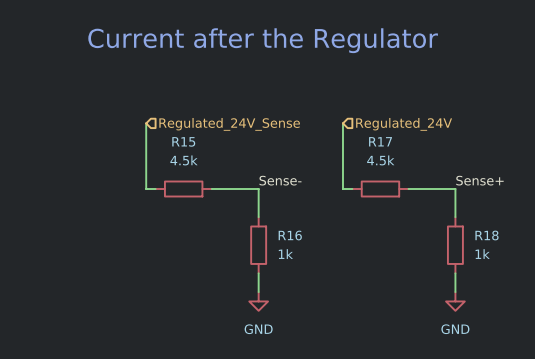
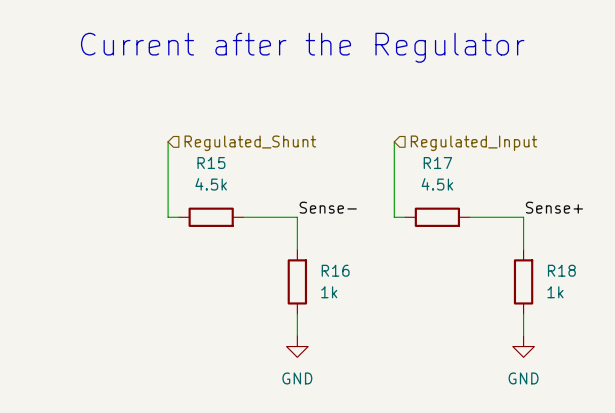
hierarchical label: Regulated_24V_Sense (229, 124) -> Regulated_Shunt (250, 143)
hierarchical label: Regulated_24V (404, 124) -> Regulated_Input (473, 143)

